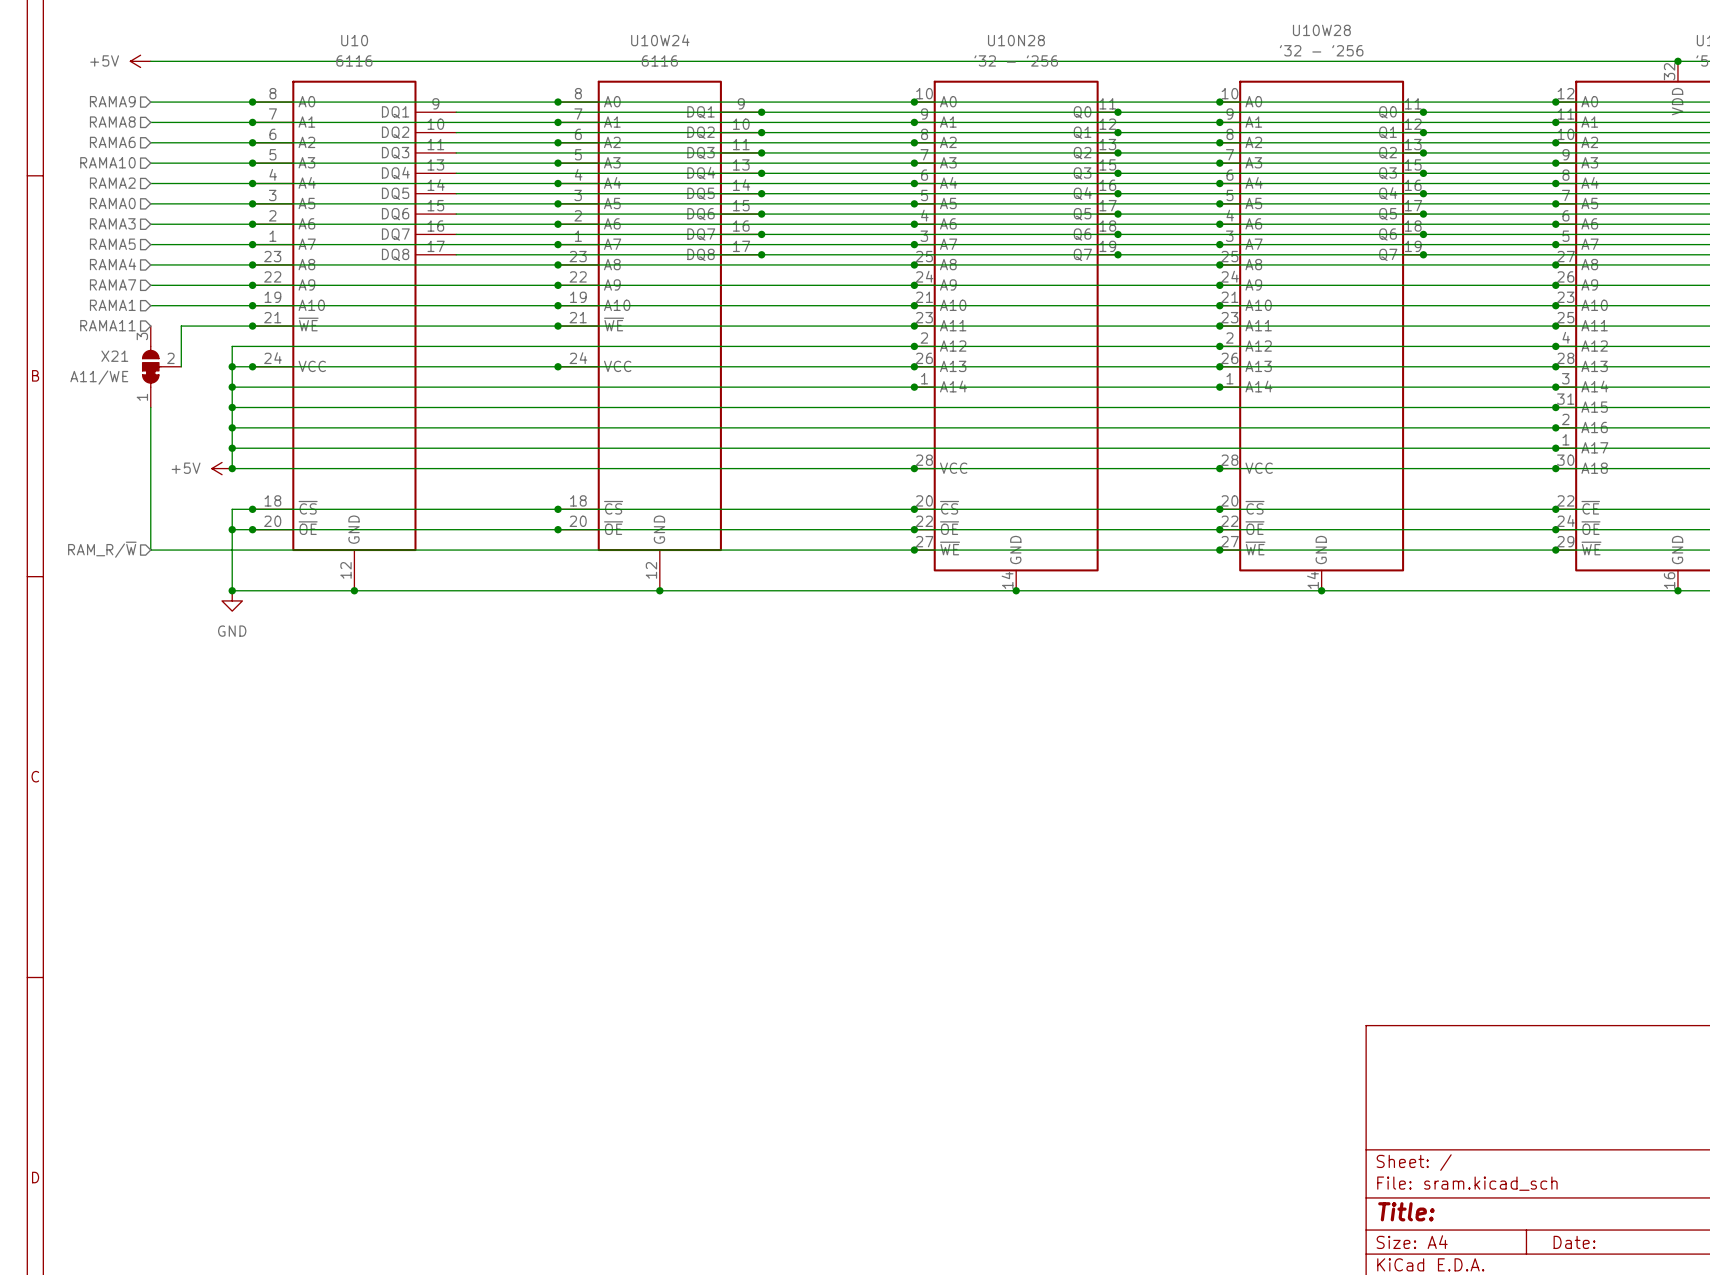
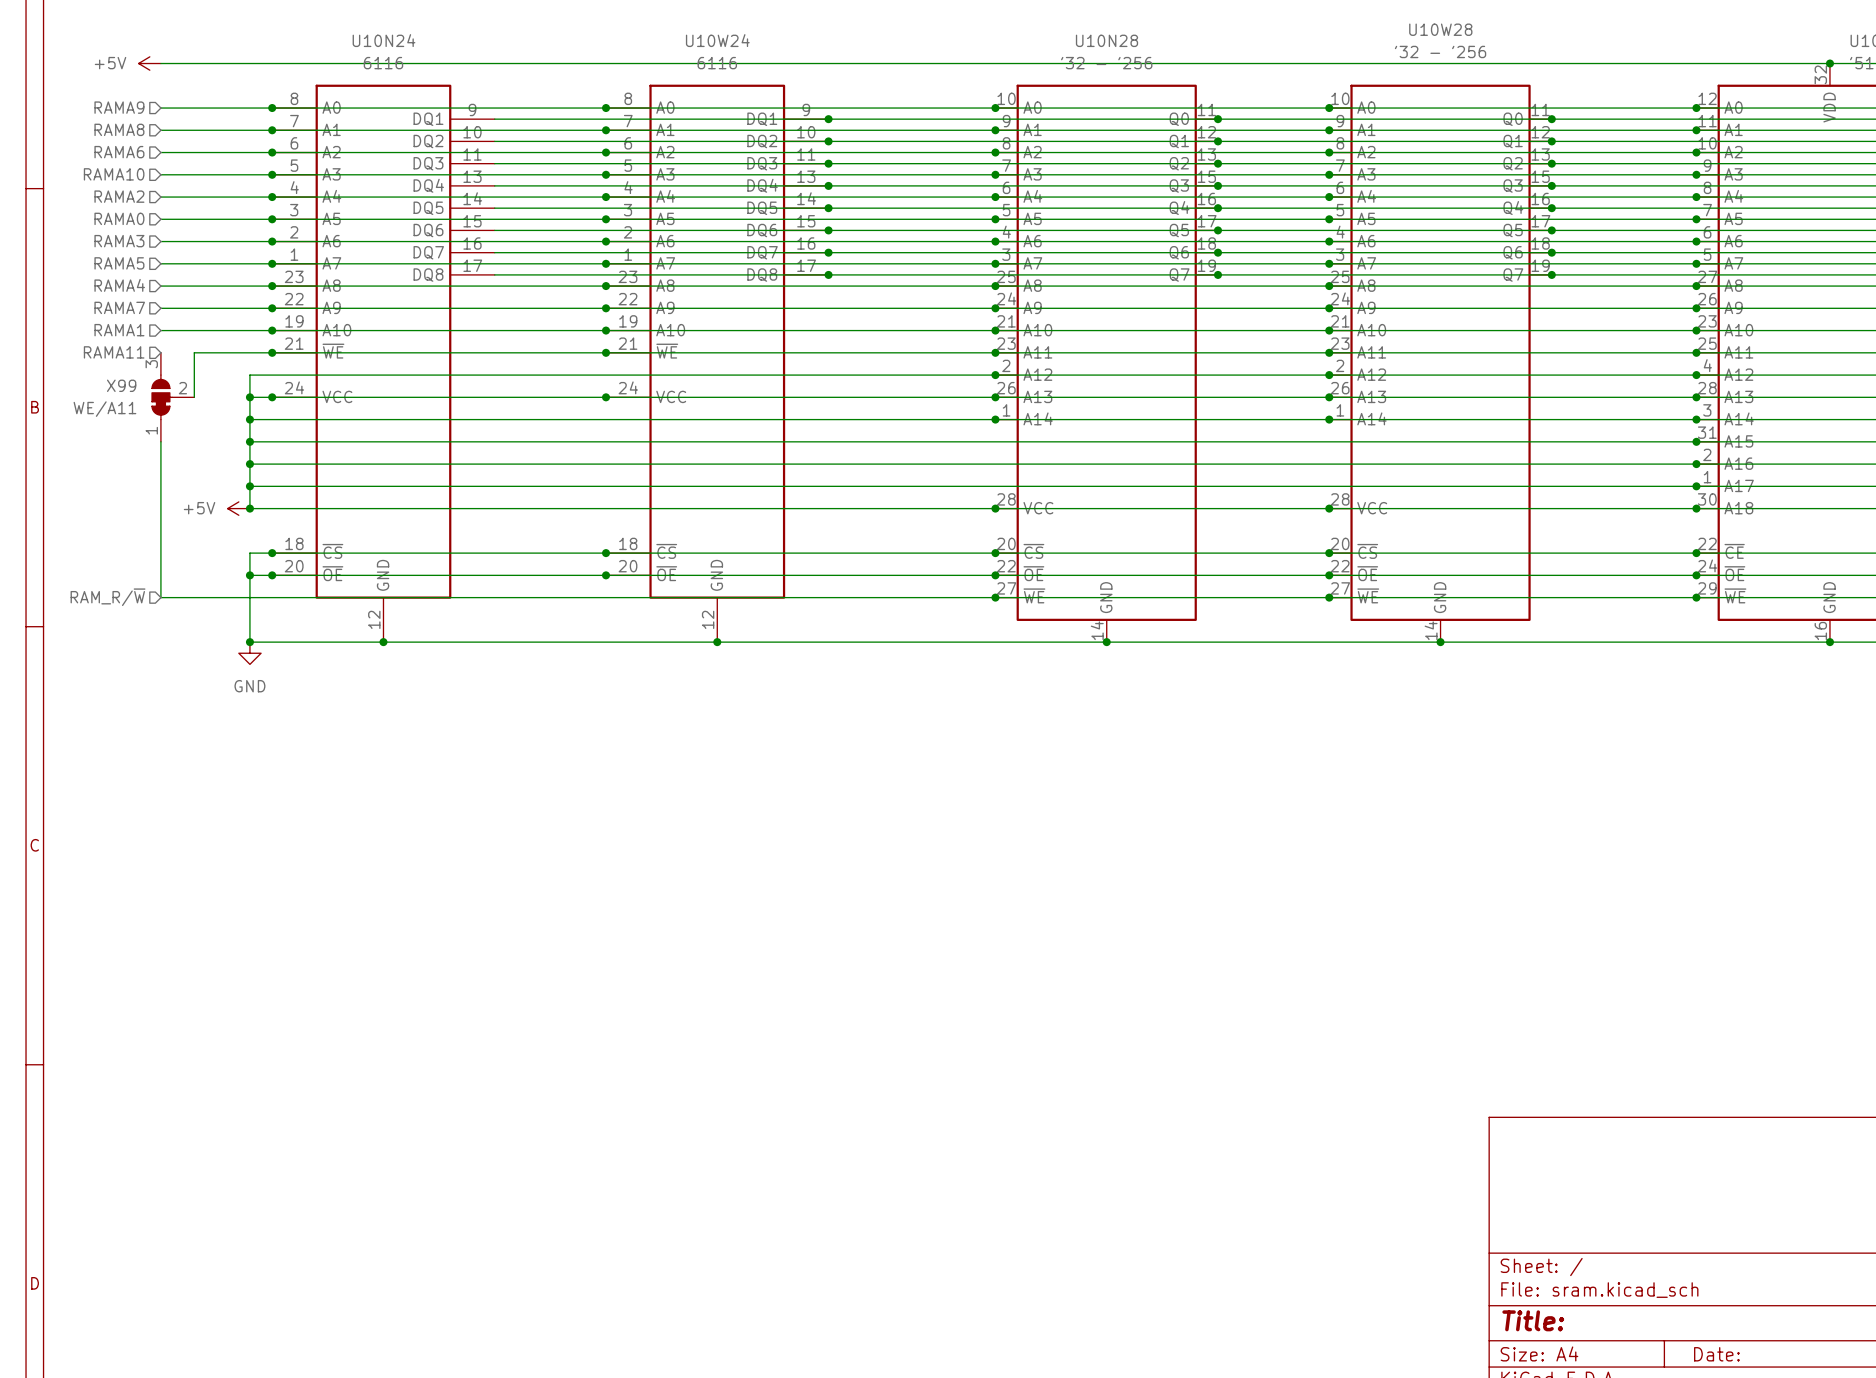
U10 name: U10 (354, 40) -> U10N24 (384, 40)
X21 name: X21 (114, 356) -> X99 (121, 385)
X21 value: A11/WE (99, 377) -> WE/A11 (104, 409)

